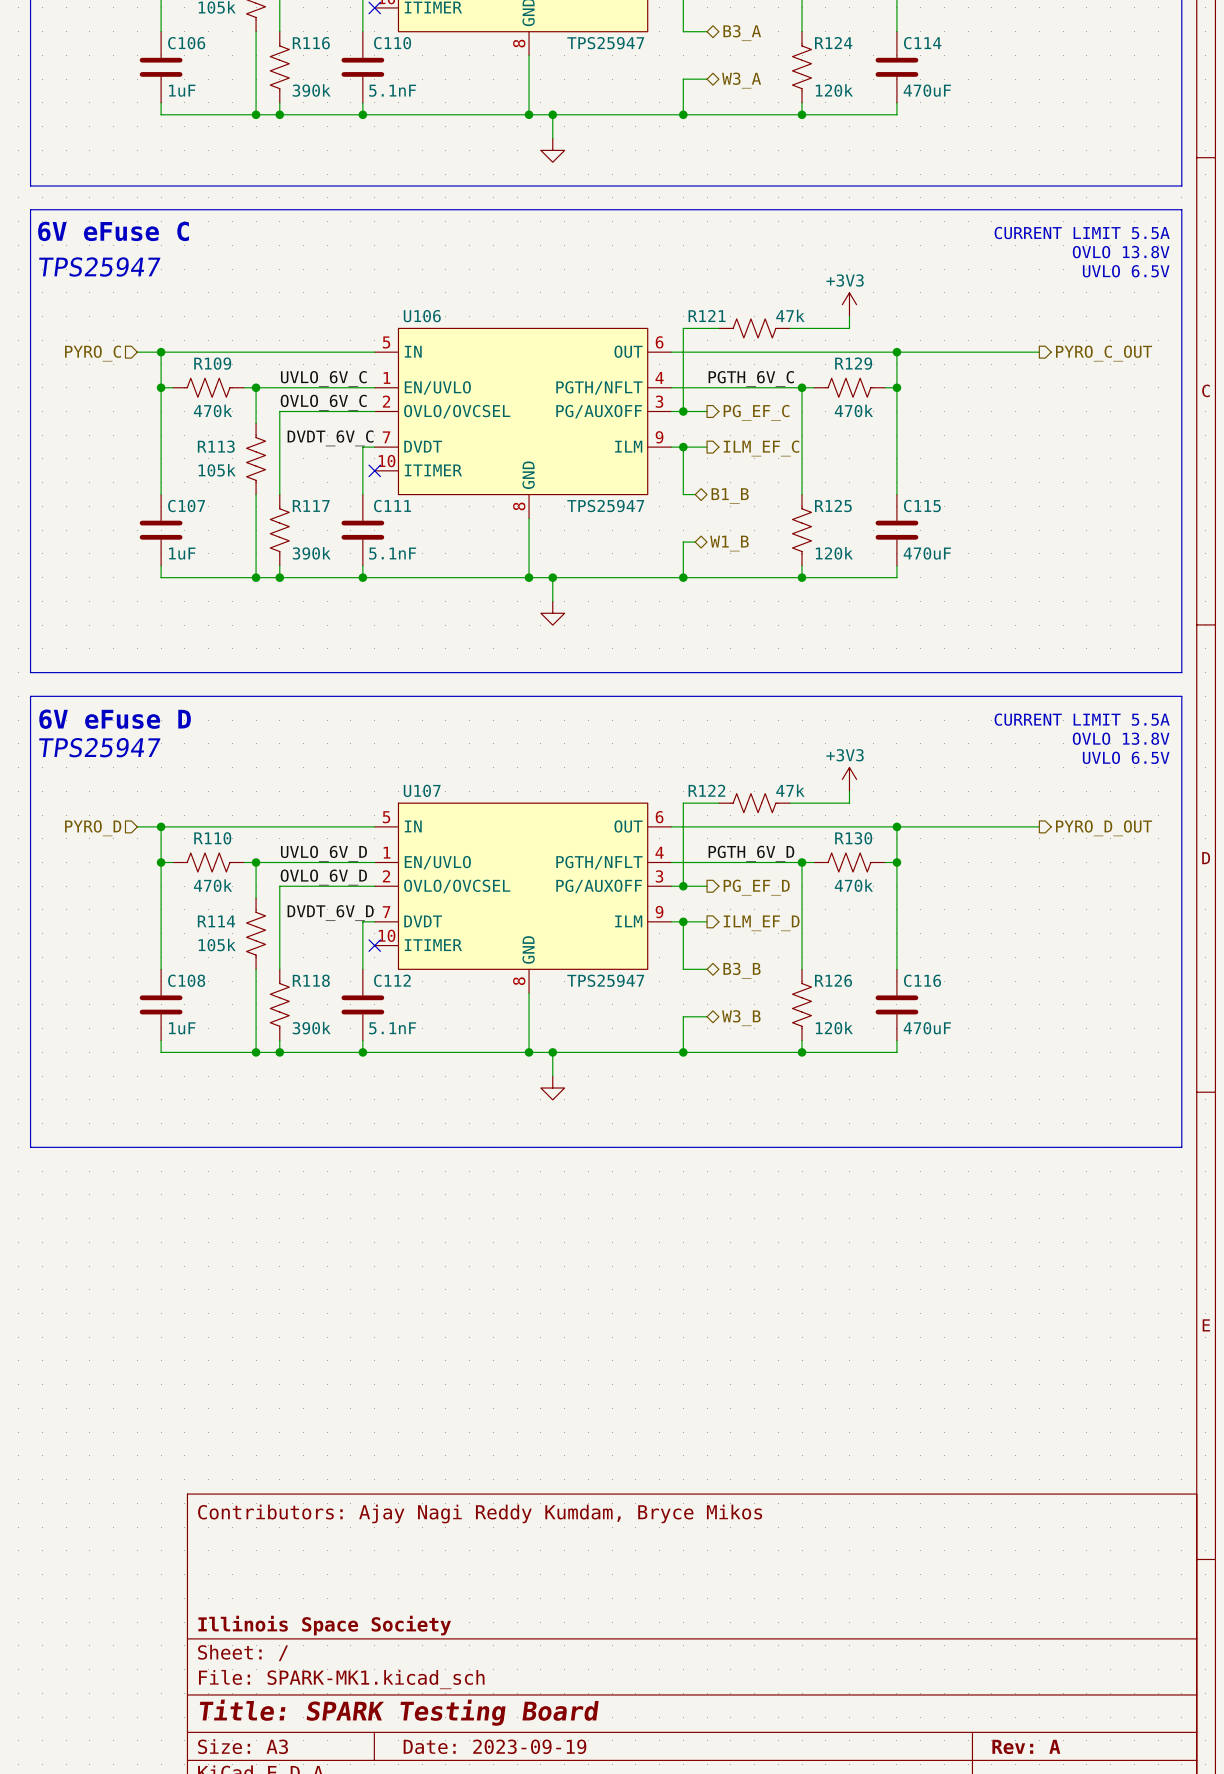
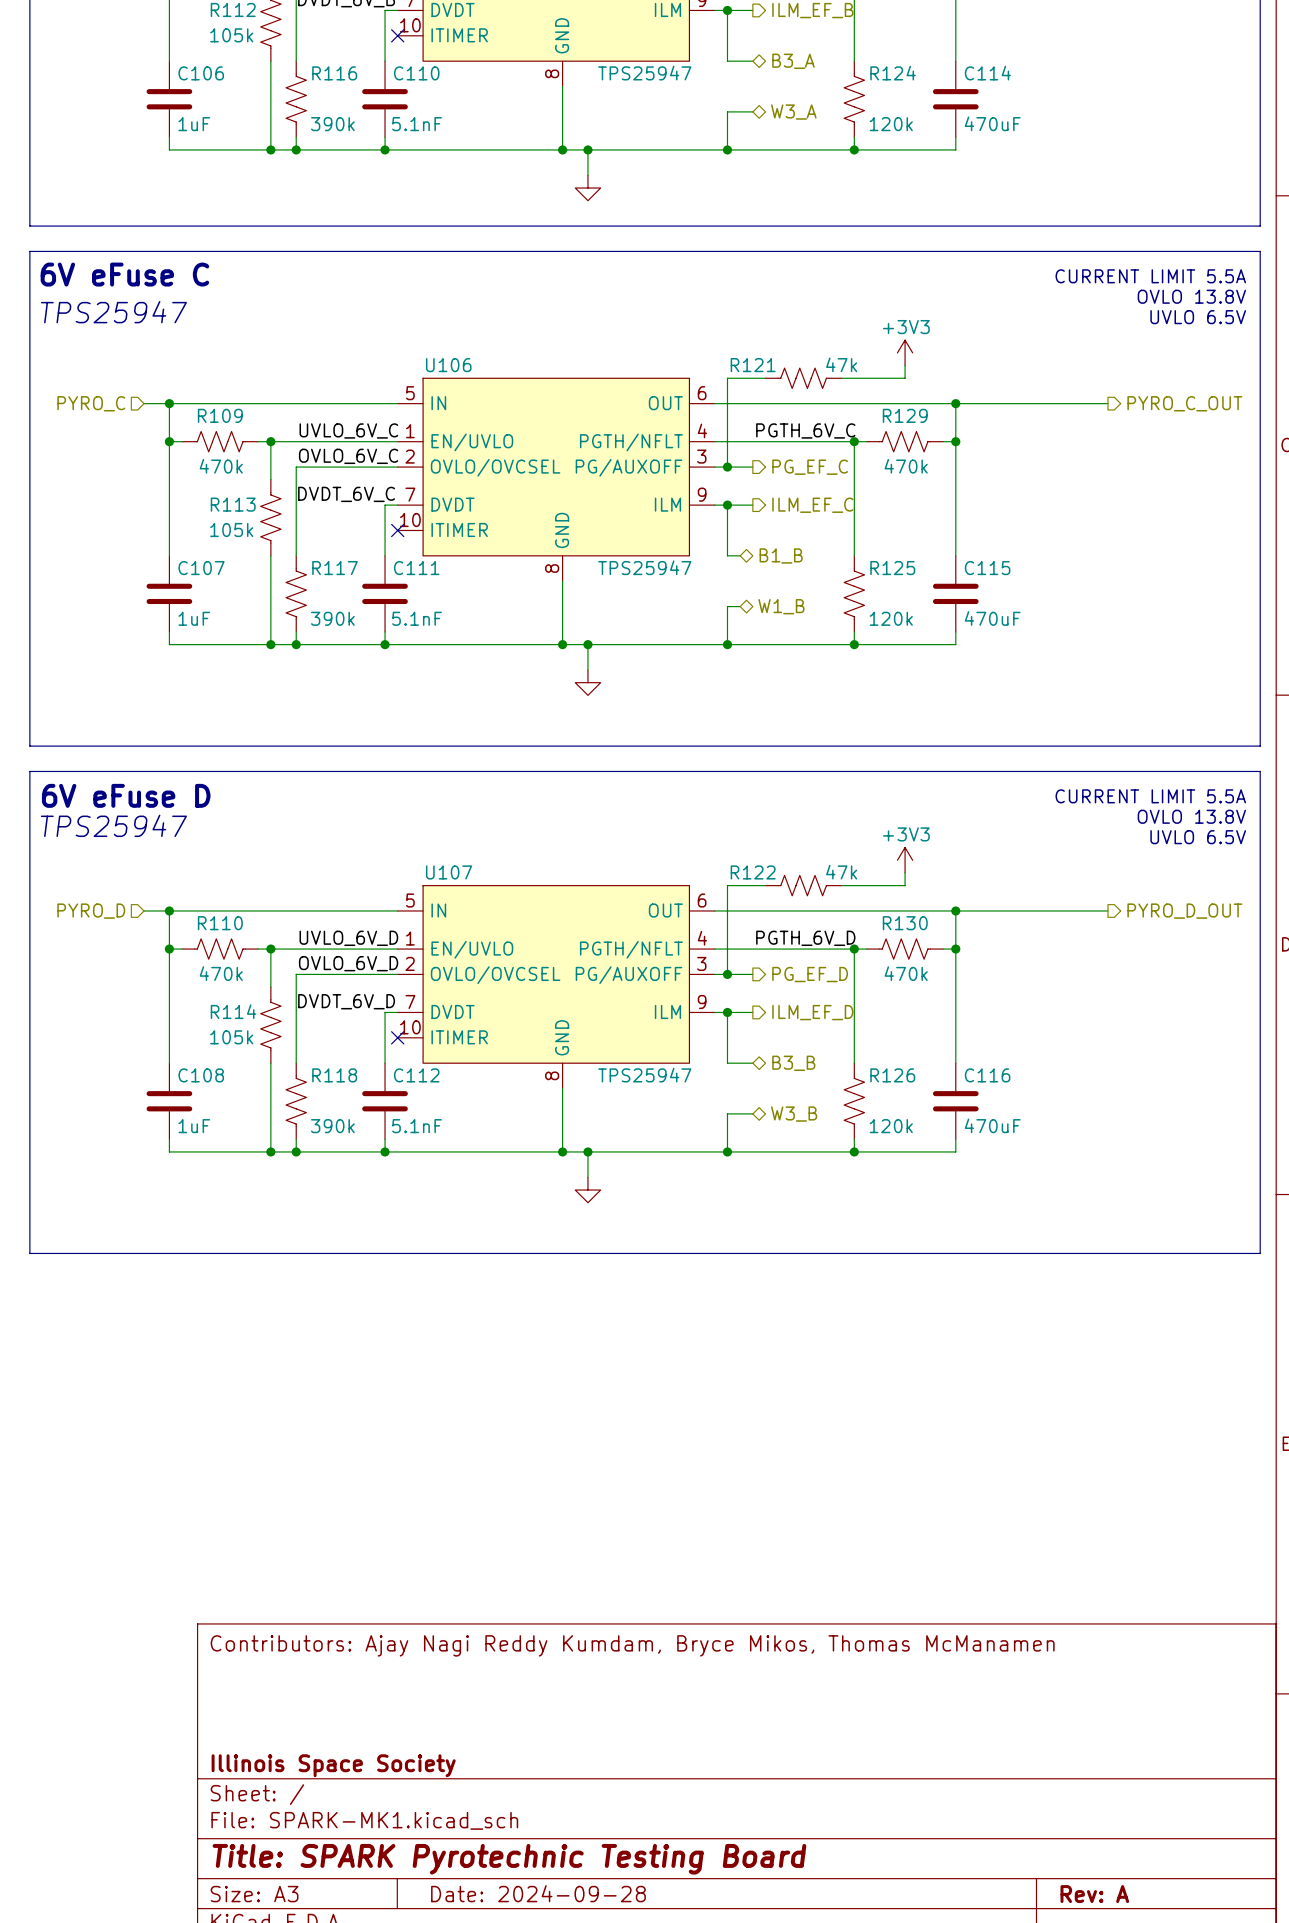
title block: Contributors: Ajay Nagi Reddy Kumdam, Bryce Mikos (480, 1513) -> Contributors: Ajay Nagi Reddy Kumdam, Bryce Mikos, Thomas McManamen (632, 1645)
title block: Title: SPARK Testing Board (399, 1712) -> Title: SPARK Pyrotechnic Testing Board (509, 1859)
title block: Date: 2023-09-19 (494, 1746) -> Date: 2024-09-28 (538, 1893)

